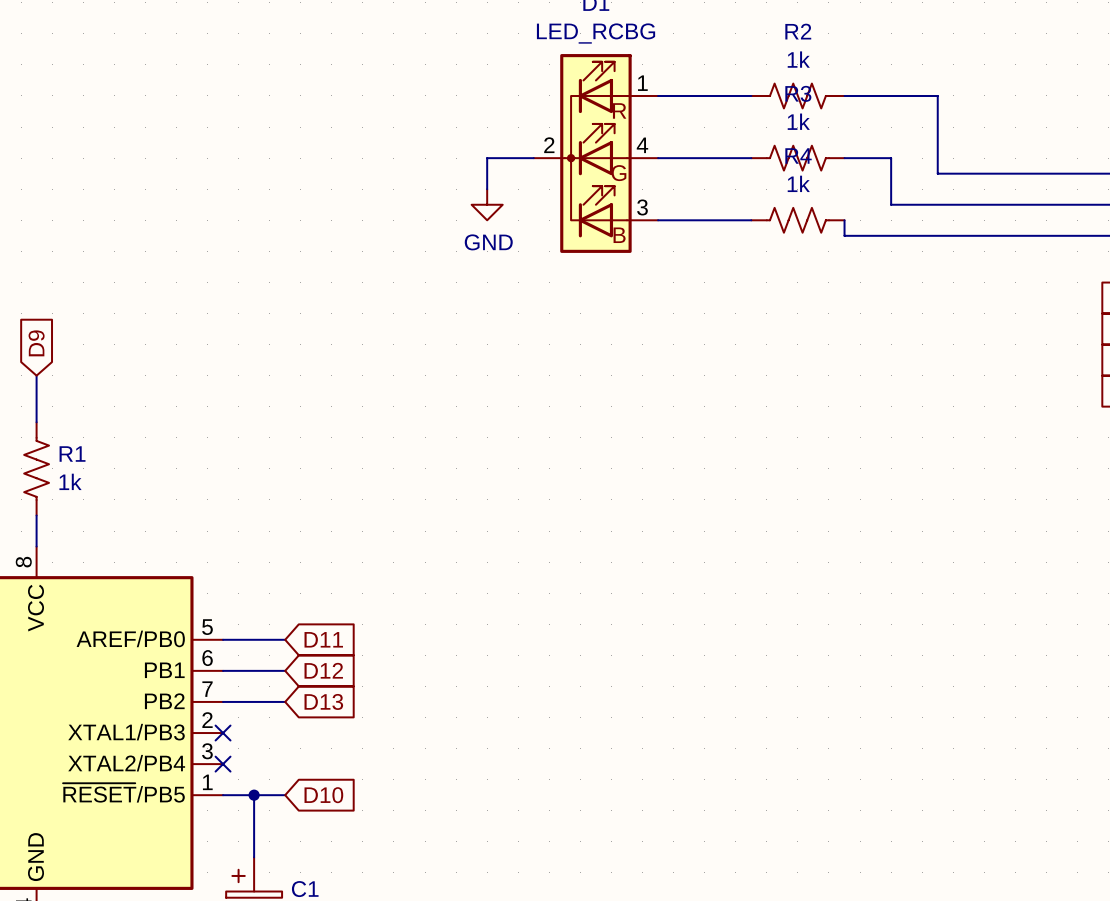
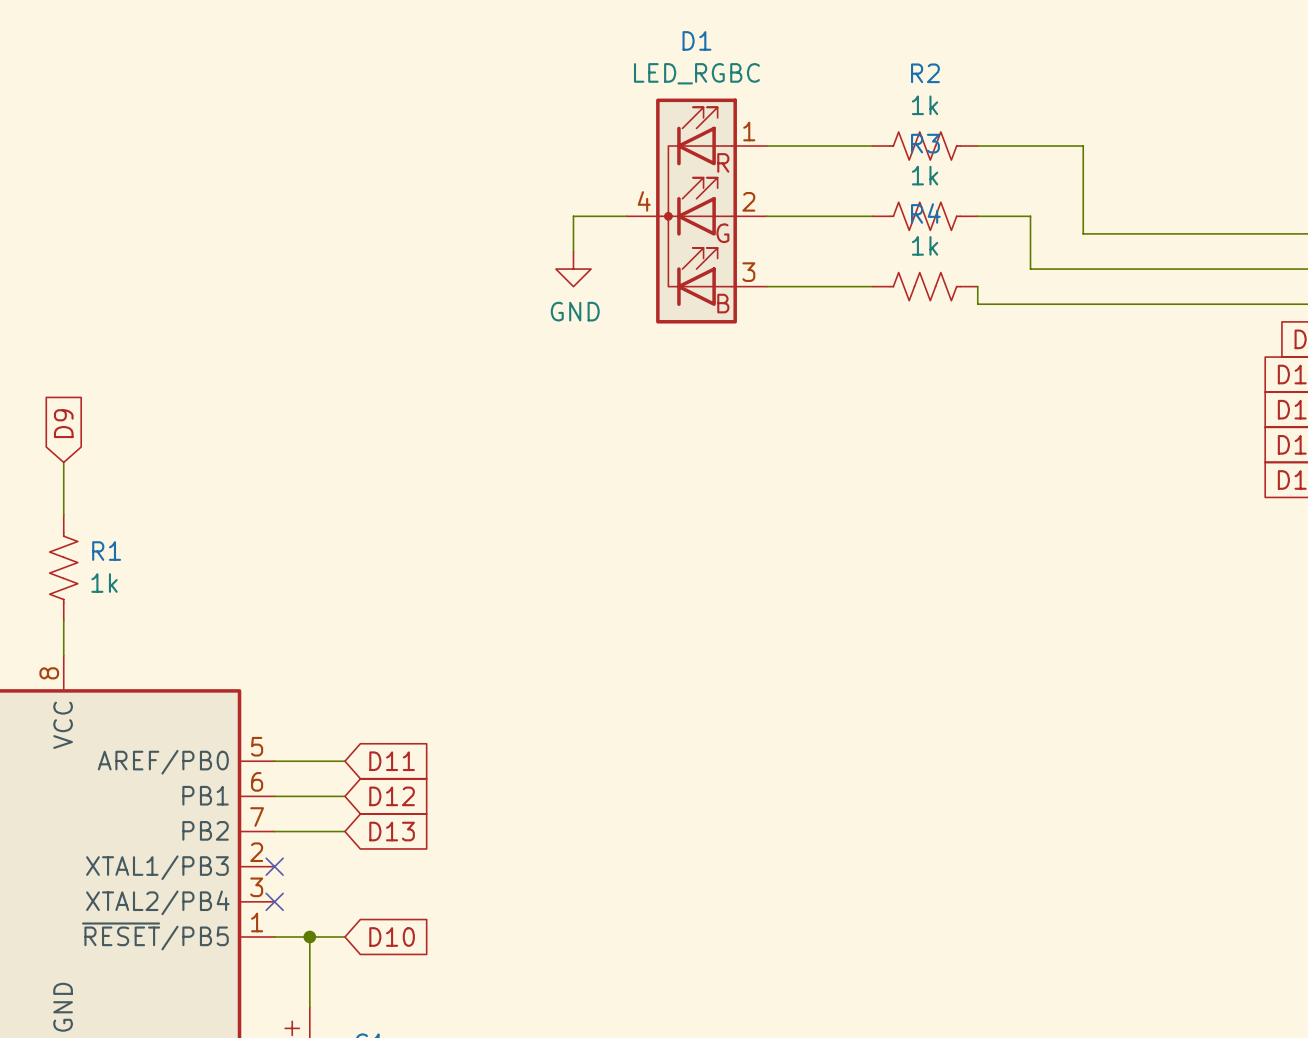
D1 value: LED_RCBG (596, 33) -> LED_RGBC (696, 73)
D1 pin number: 2 (549, 145) -> 4 (644, 201)
D1 pin number: 4 (642, 145) -> 2 (748, 201)

